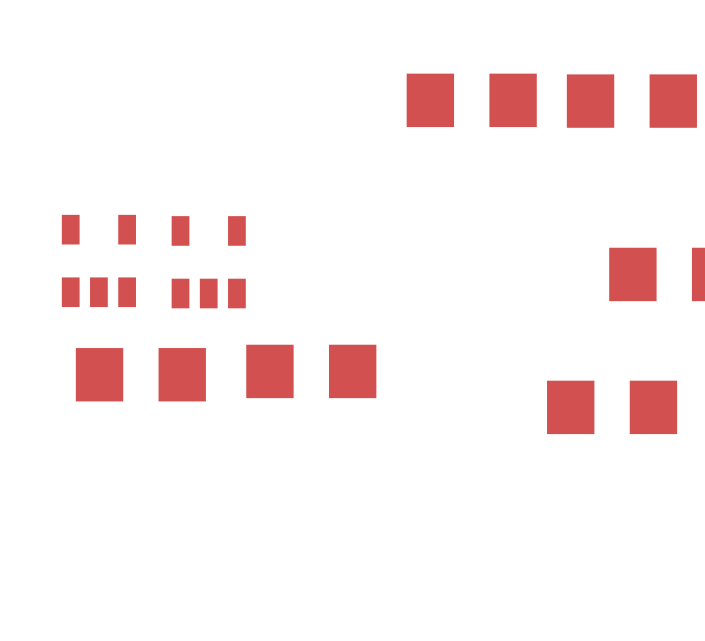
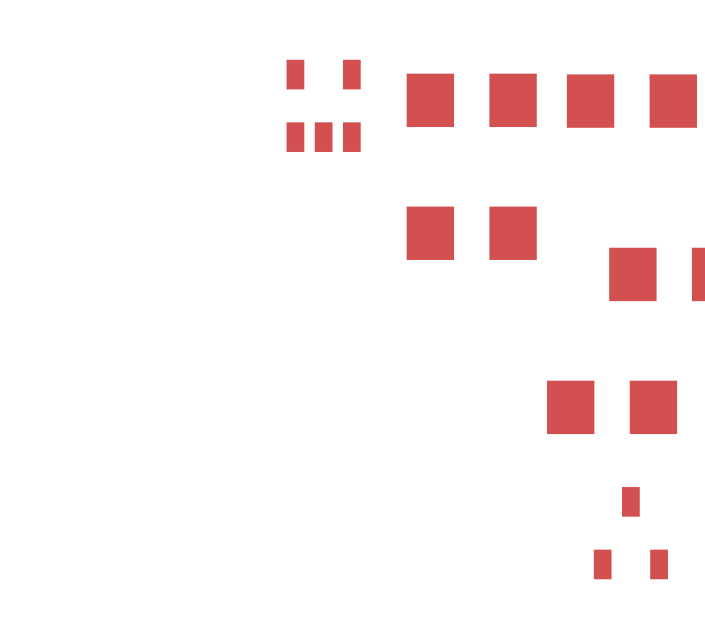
part: none -> (323, 105)
part: none -> (471, 233)
part: (98, 260) -> none
part: (208, 262) -> none
part: (311, 371) -> none
part: (140, 374) -> none
part: none -> (630, 533)

